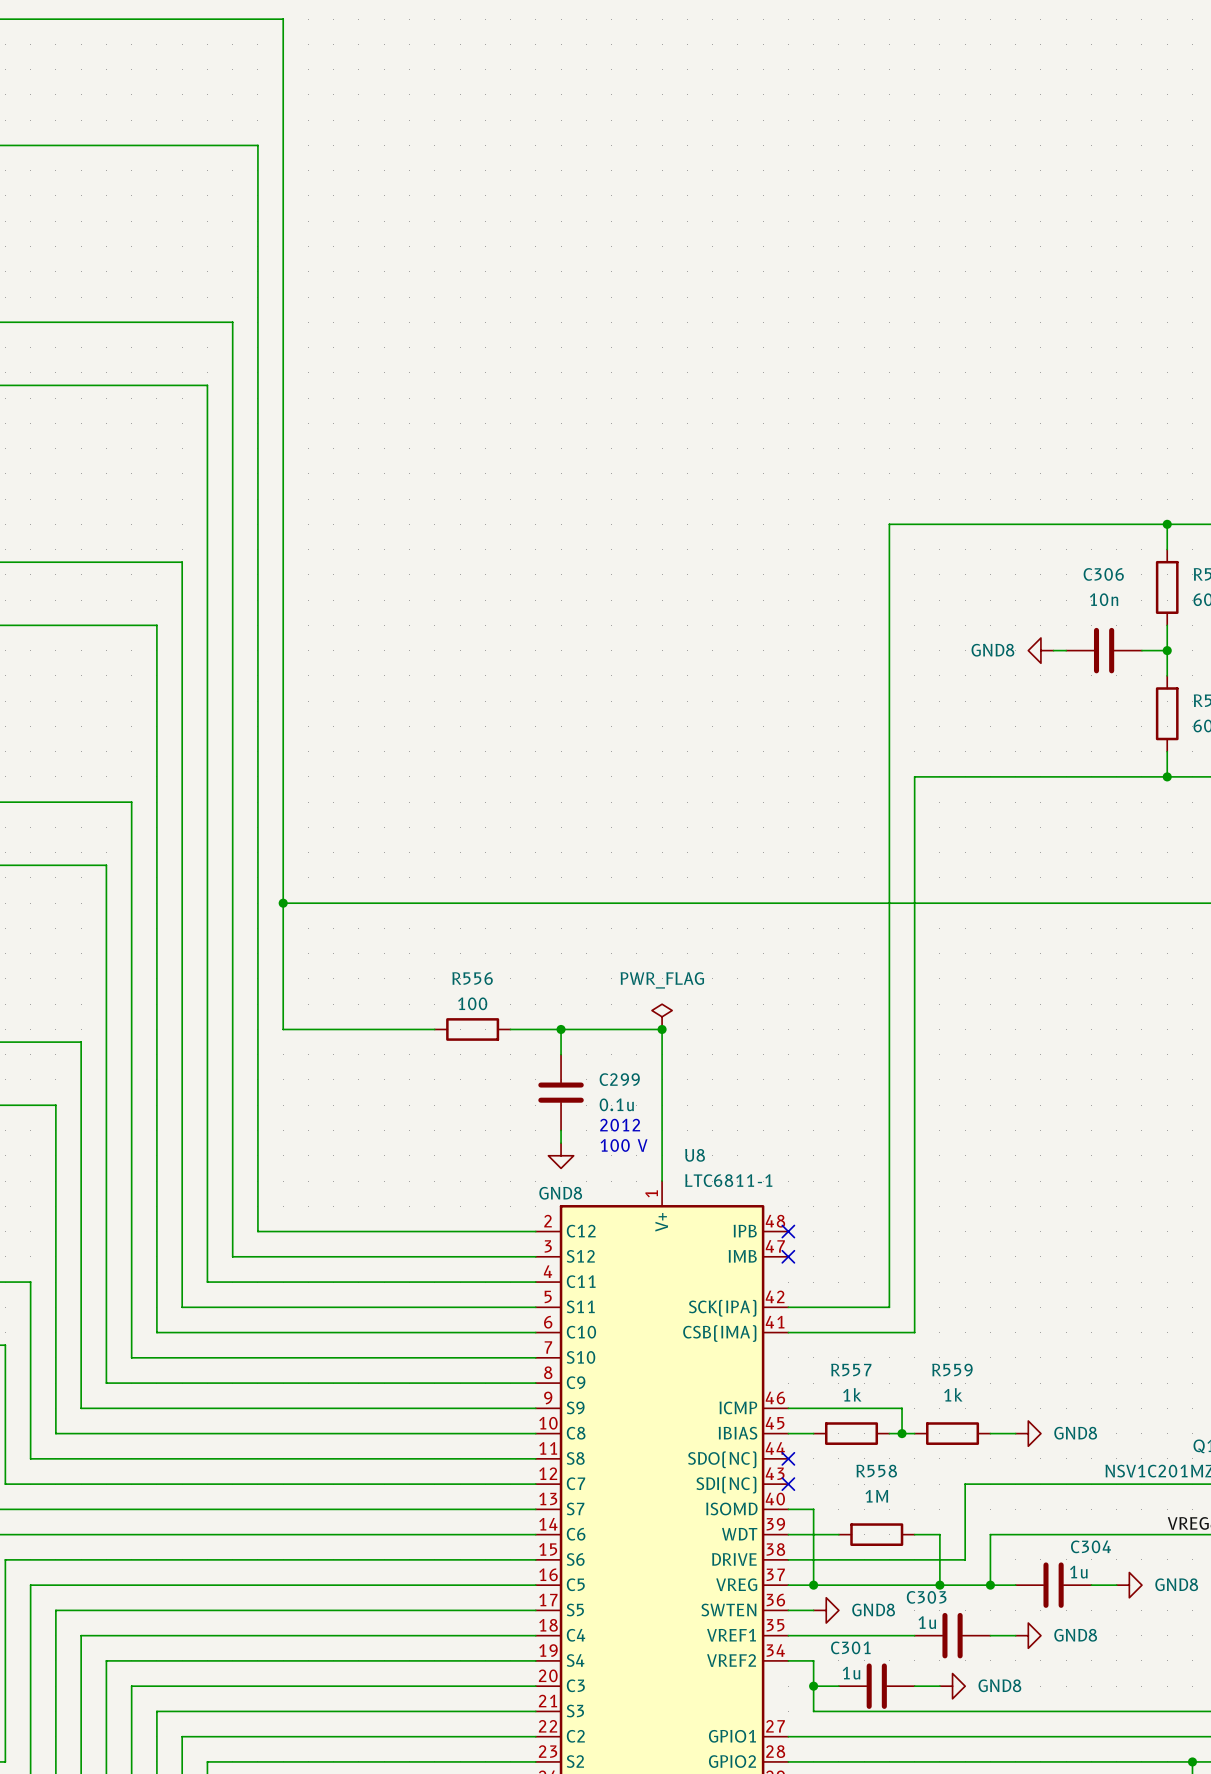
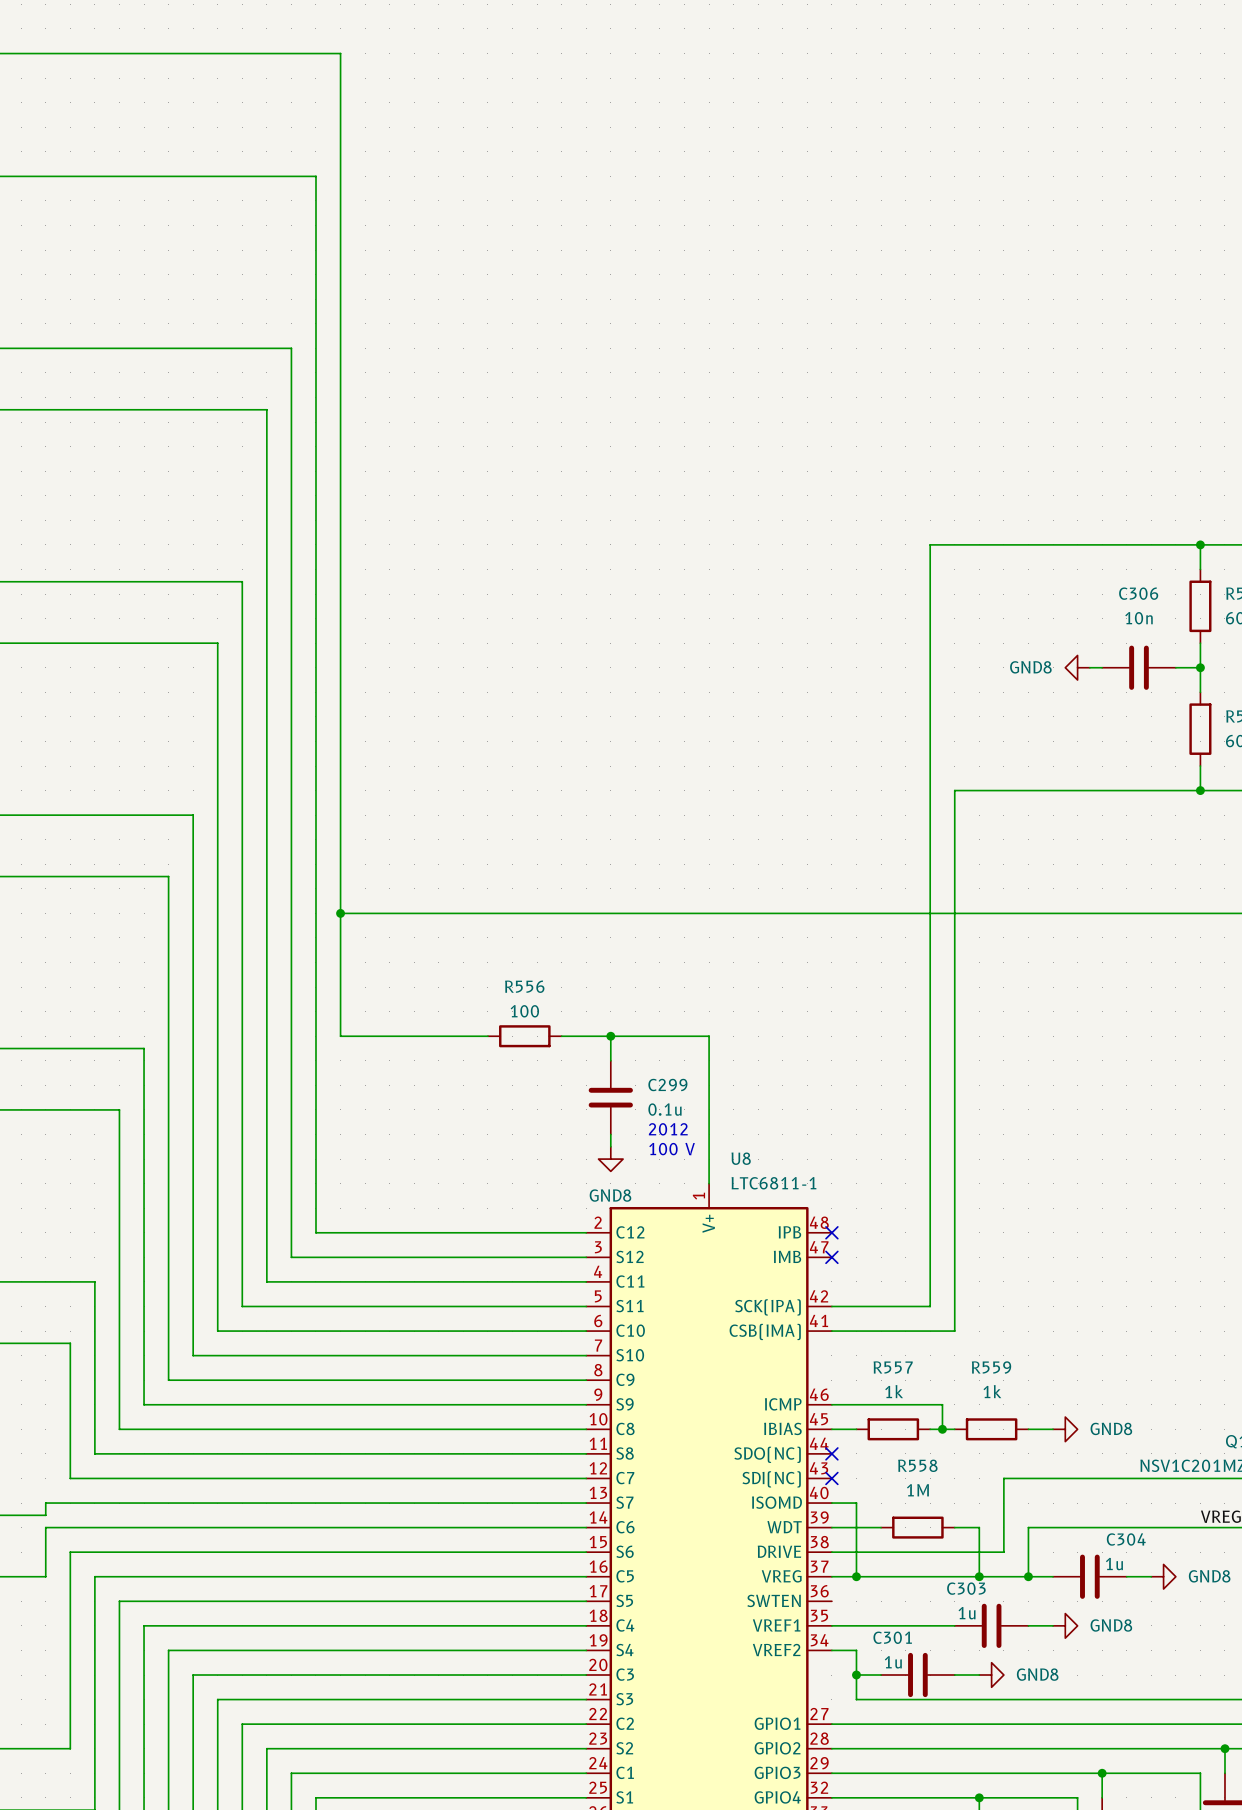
power symbol: PWR_FLAG (662, 1016) -> none
junction: (662, 1029) -> none
wire: (788, 1610) (813, 1610) -> none
power symbol: GND8 (826, 1610) -> none

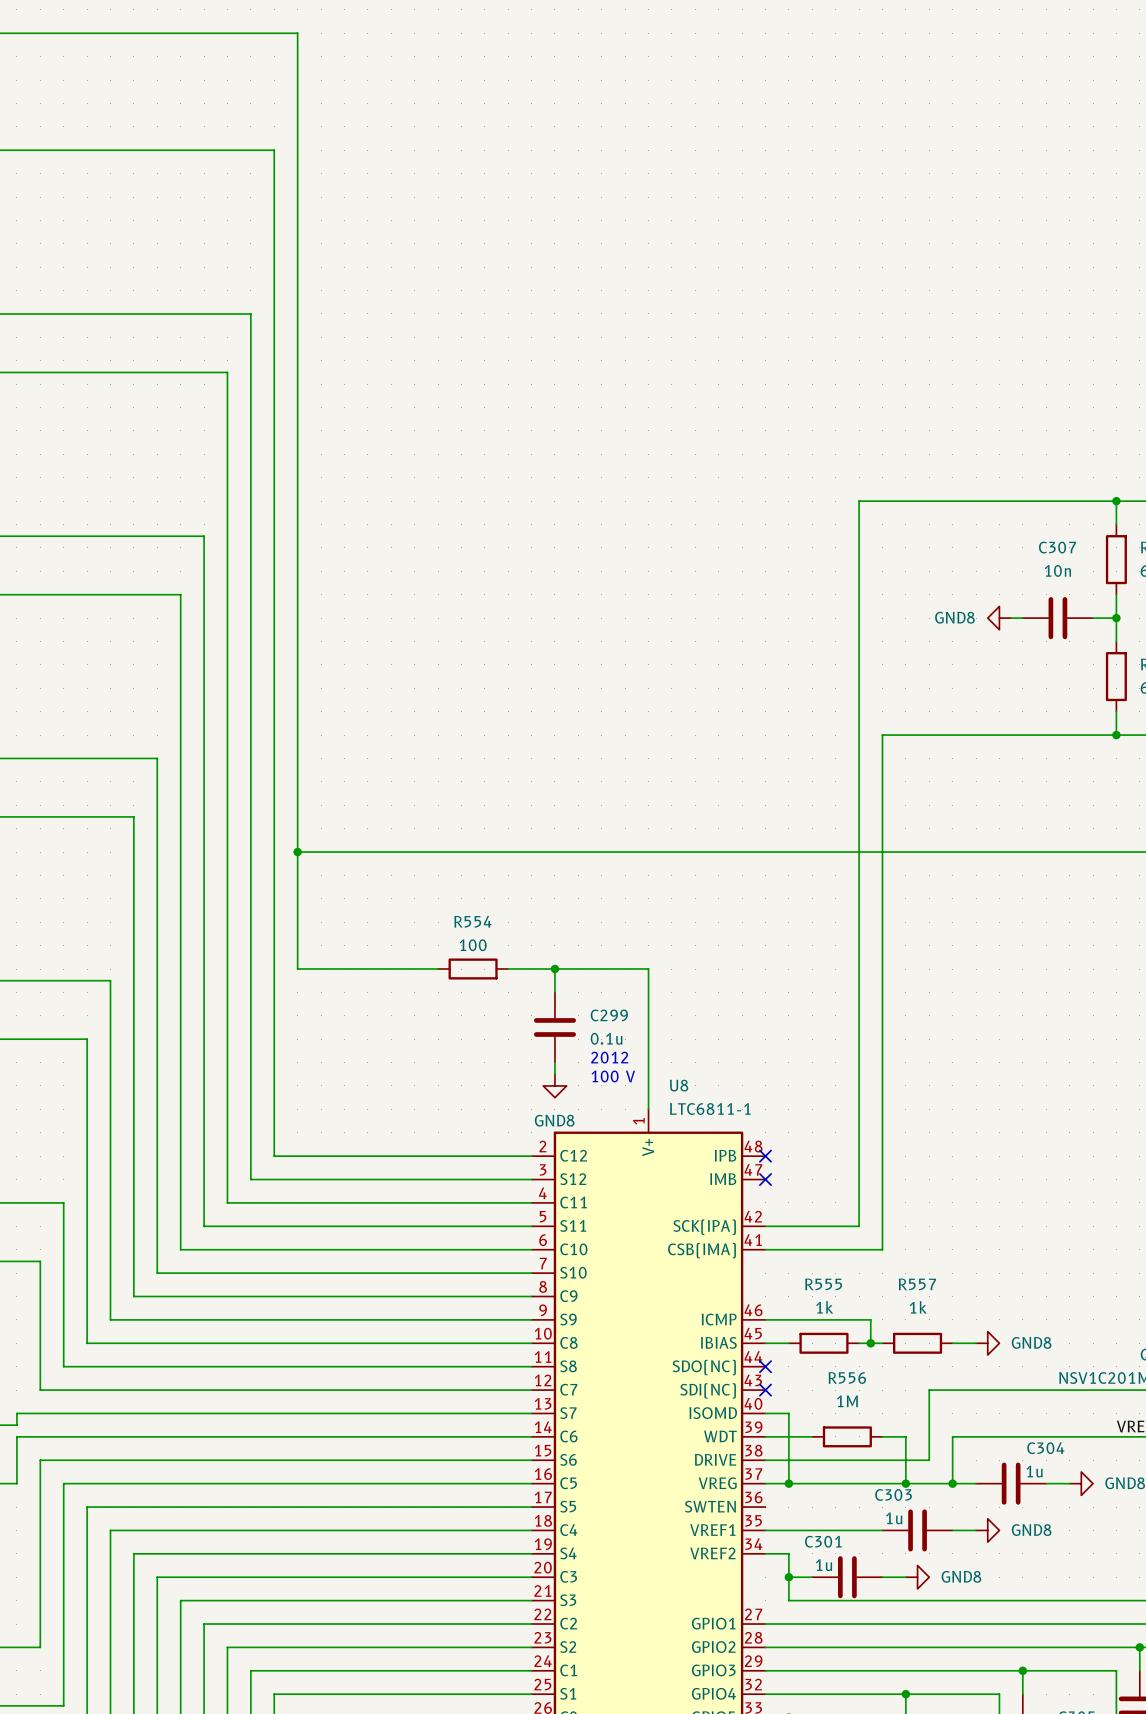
C306 name: C306 (1138, 593) -> C307 (1057, 547)
R556 name: R556 (524, 986) -> R554 (472, 921)
R557 name: R557 (893, 1367) -> R555 (823, 1284)
R559 name: R559 (991, 1367) -> R557 (917, 1284)
R558 name: R558 (917, 1465) -> R556 (847, 1378)

